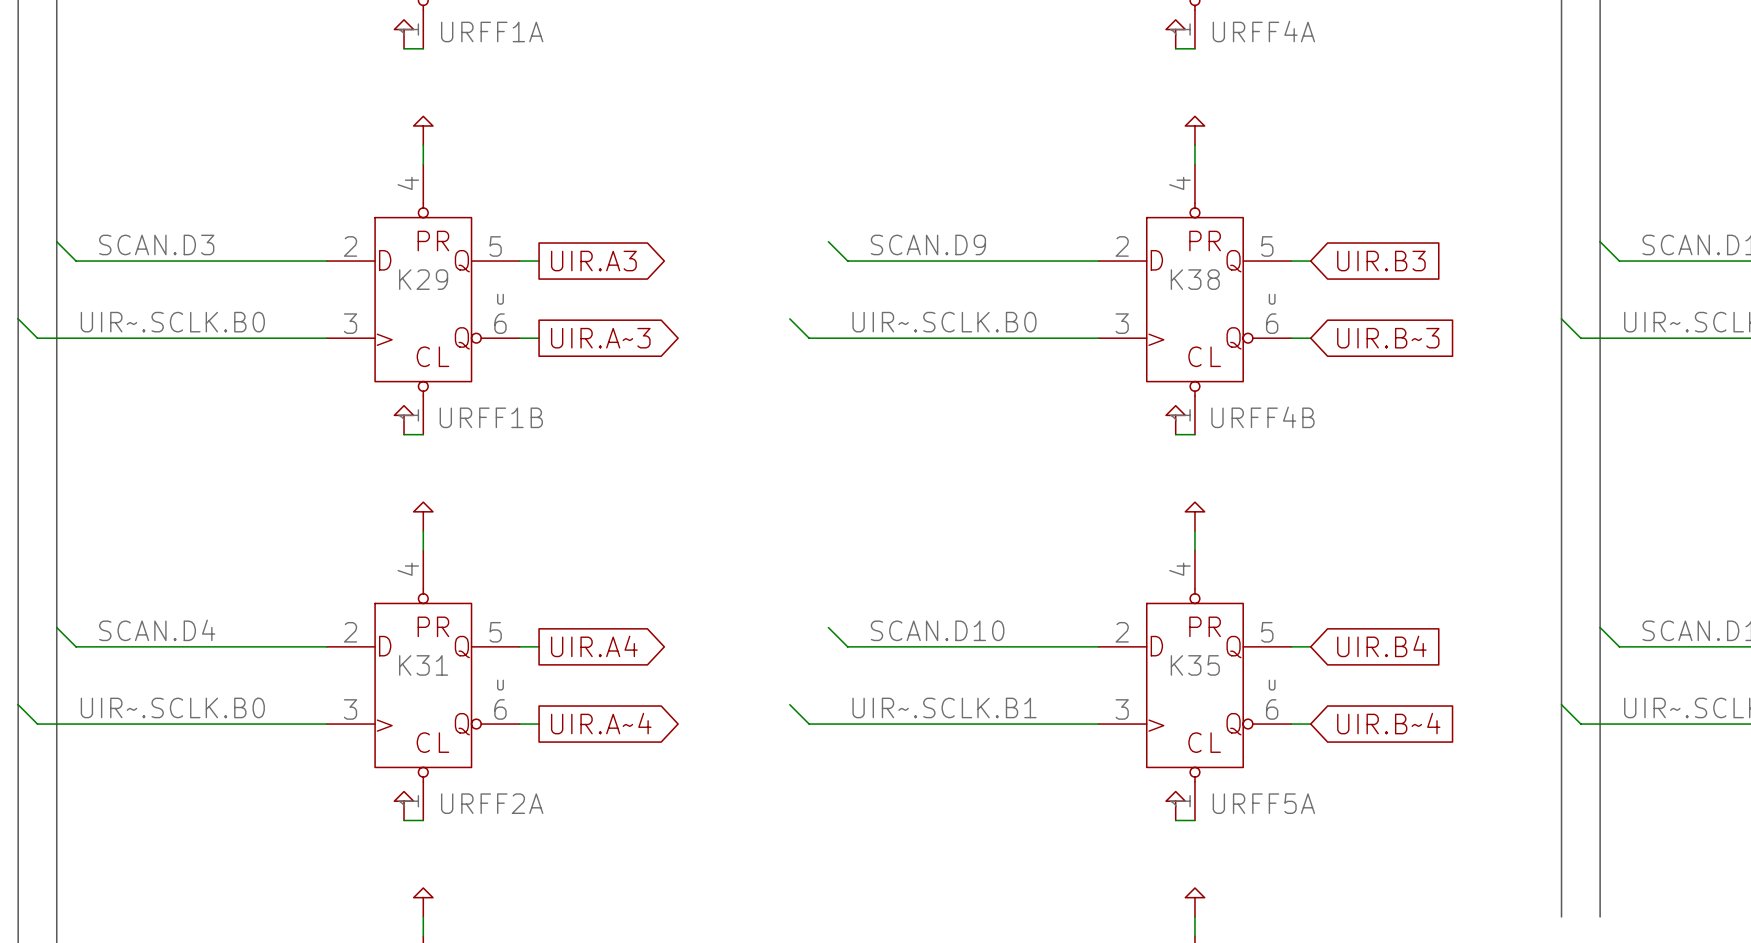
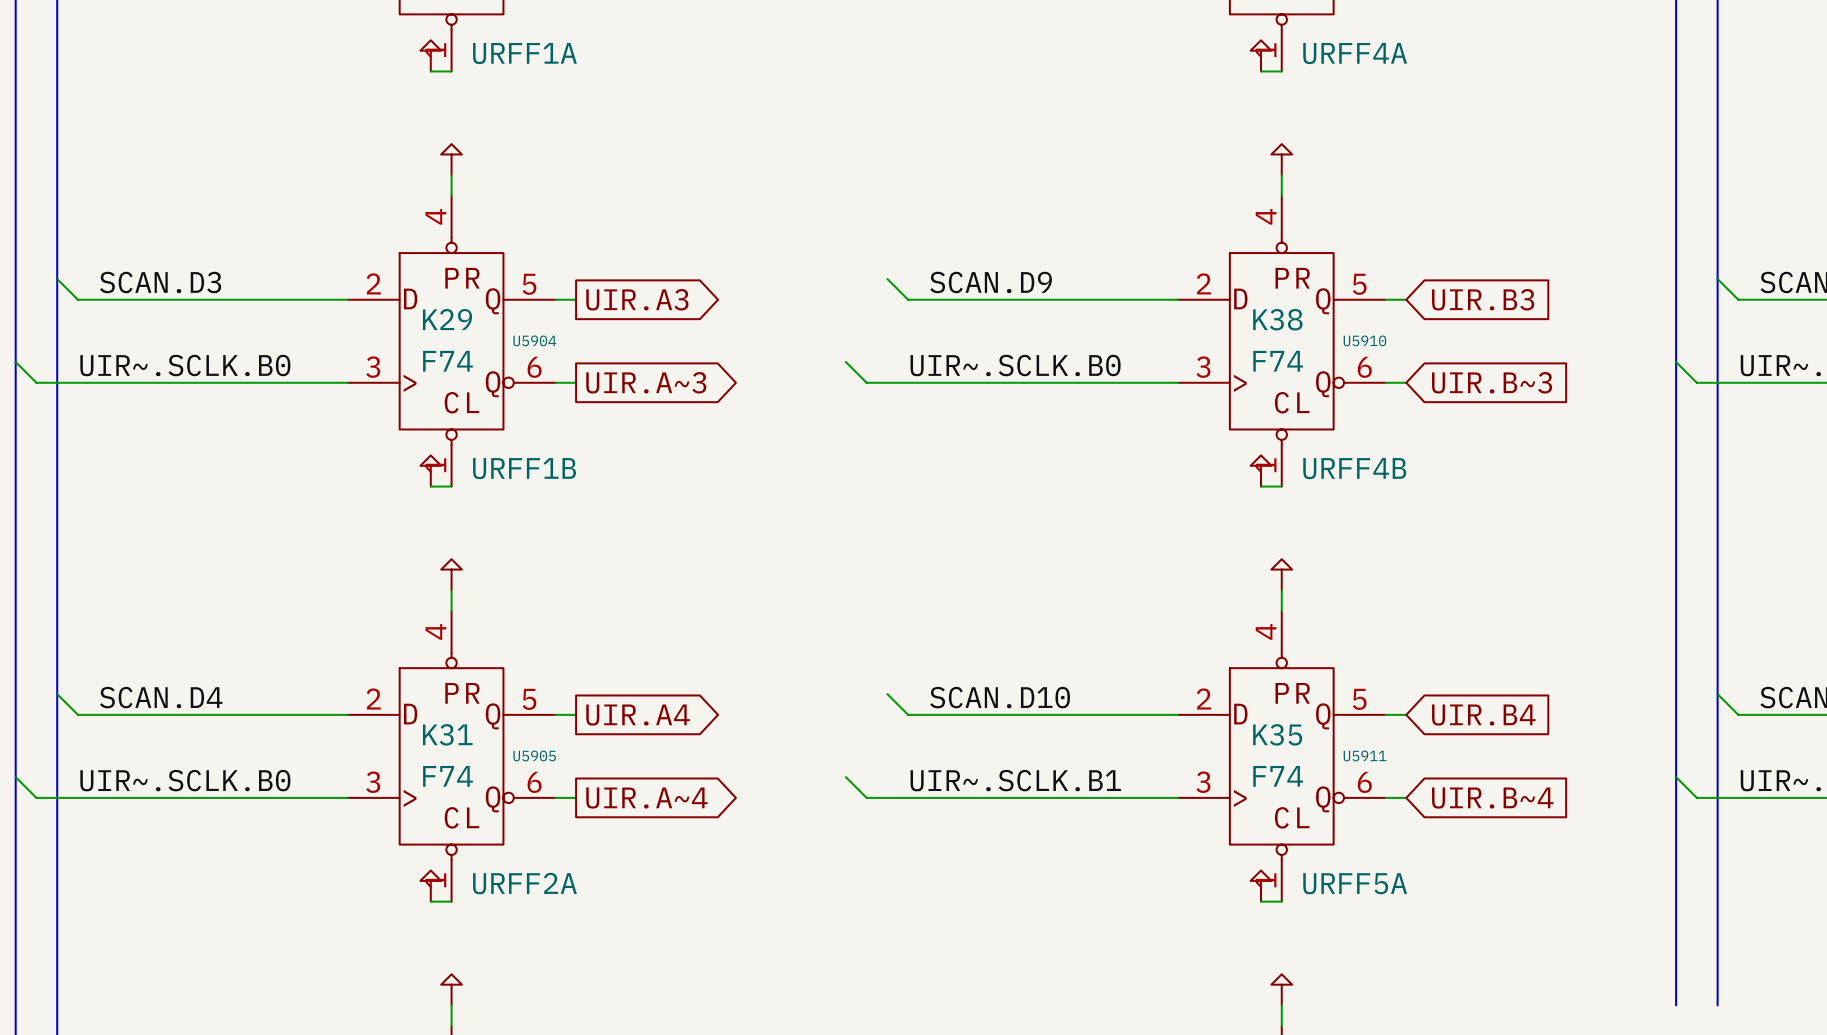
U name: U (500, 299) -> U5904 (534, 340)
U name: U (1272, 299) -> U5910 (1364, 340)
U value: none -> F74 (447, 361)
U value: none -> F74 (1278, 361)
U name: U (500, 685) -> U5905 (534, 755)
U name: U (1272, 685) -> U5911 (1365, 755)
U value: none -> F74 (447, 776)
U value: none -> F74 (1278, 776)

